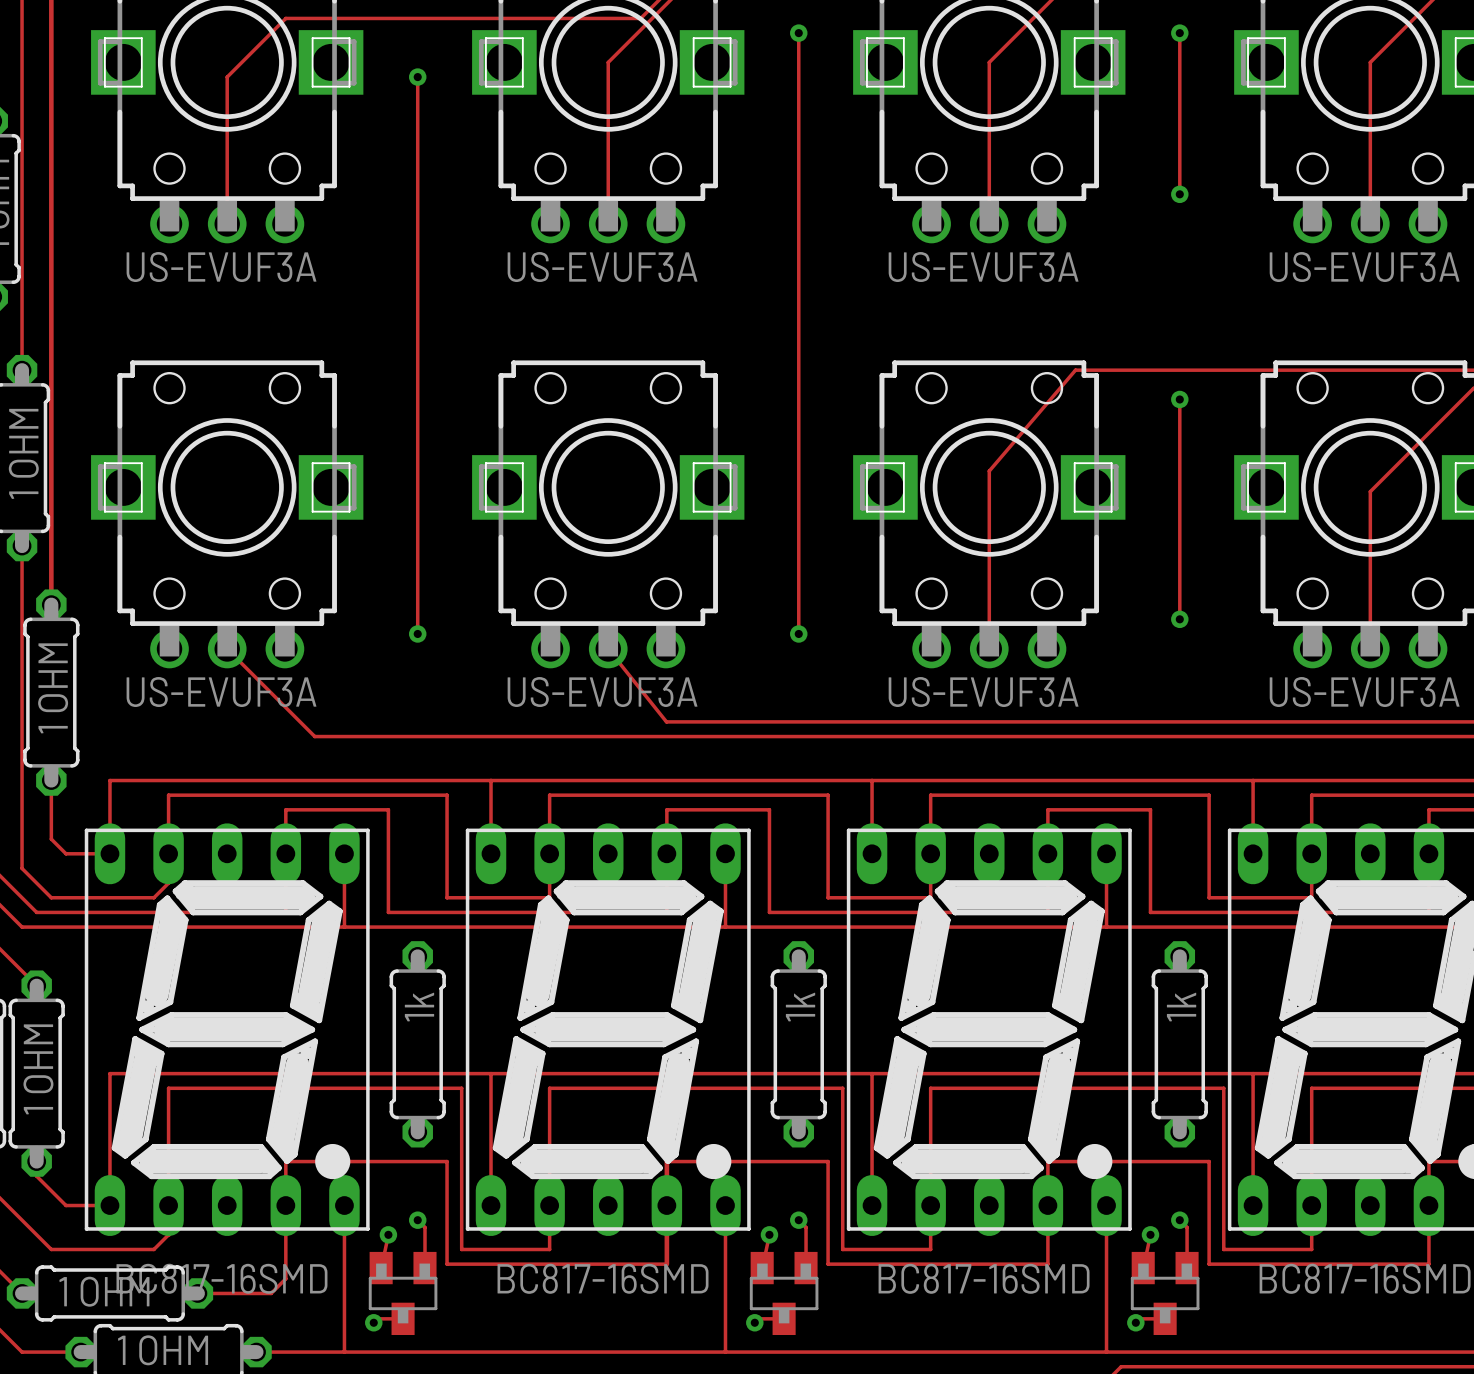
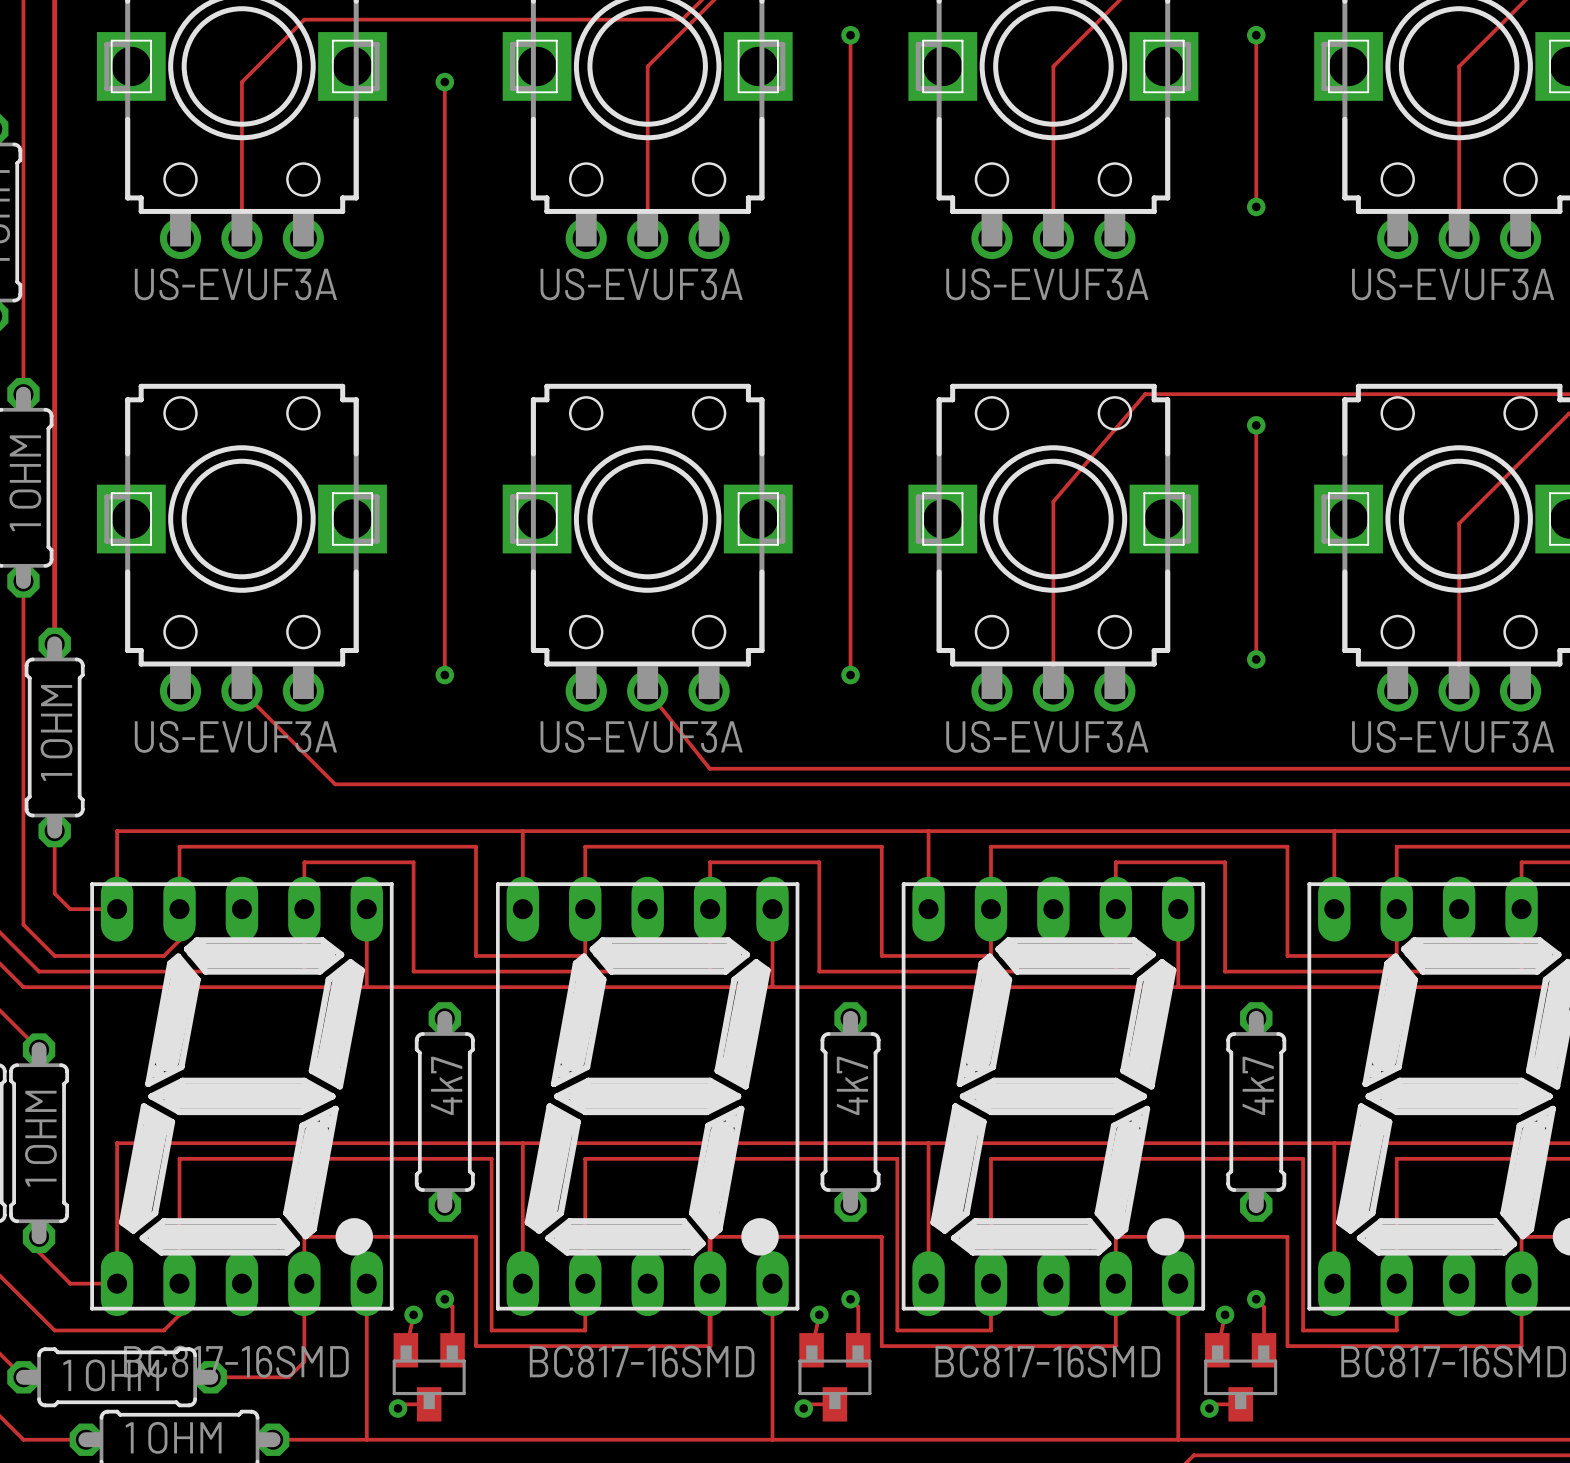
part value: 1k (419, 1007) -> 4k7 (446, 1085)
part value: 1k (800, 1007) -> 4k7 (852, 1085)
part value: 1k (1181, 1007) -> 4k7 (1258, 1085)

